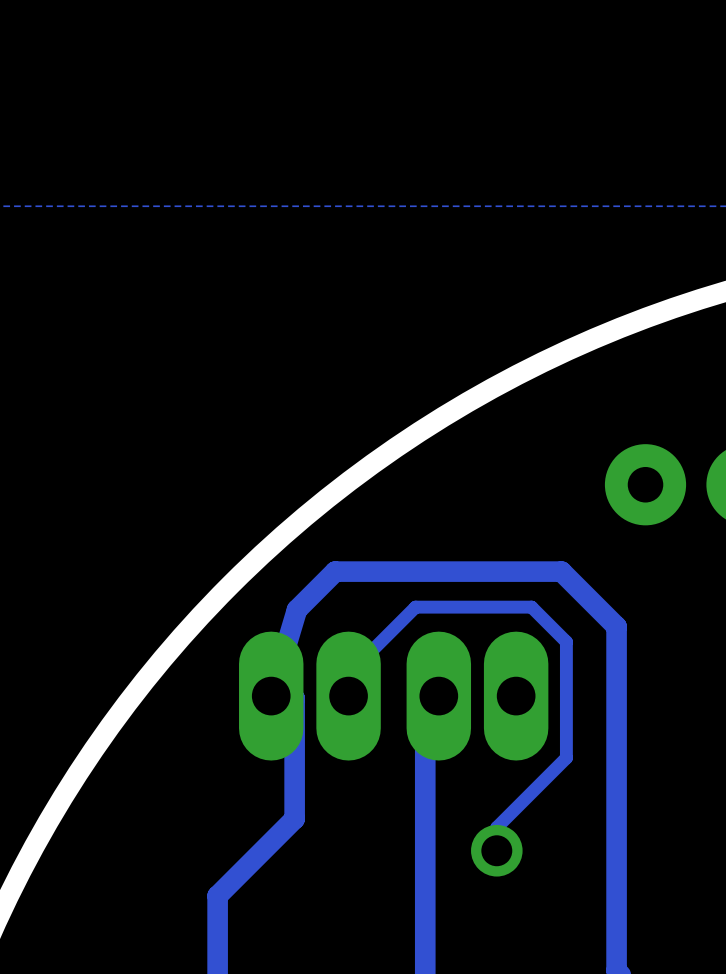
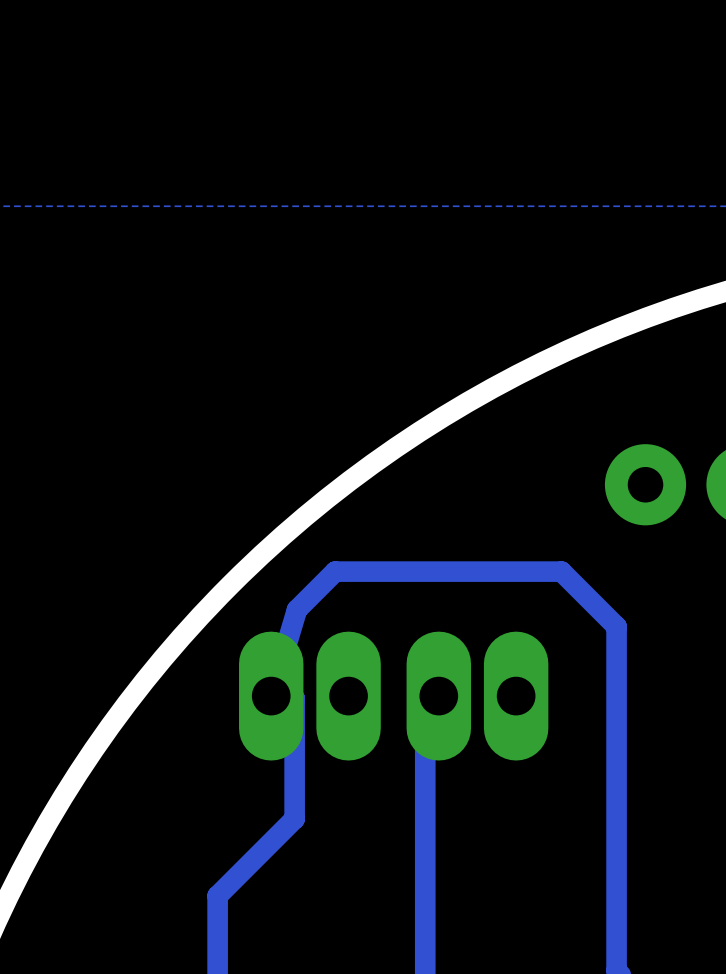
track: (348, 696) (357, 688) (357, 665) (415, 607) (531, 607) (566, 641) (566, 757) (496, 827) (496, 850) -> none
via: (496, 850) -> none

